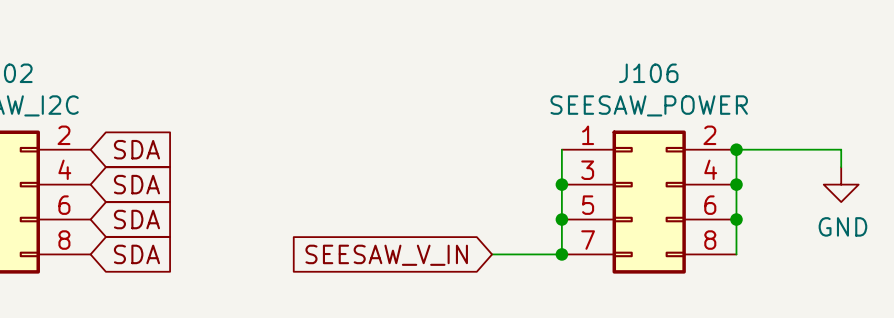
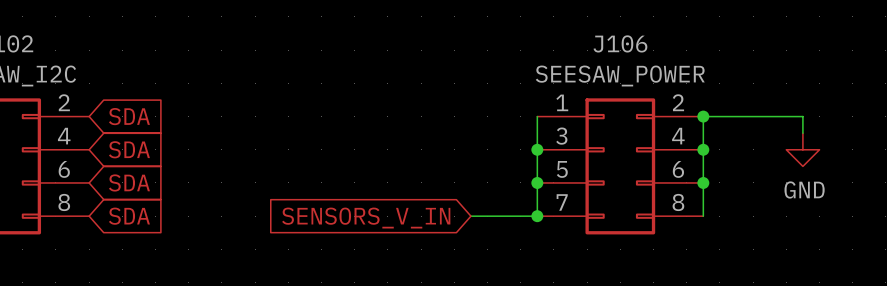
global label: SEESAW_V_IN (386, 255) -> SENSORS_V_IN (366, 218)

